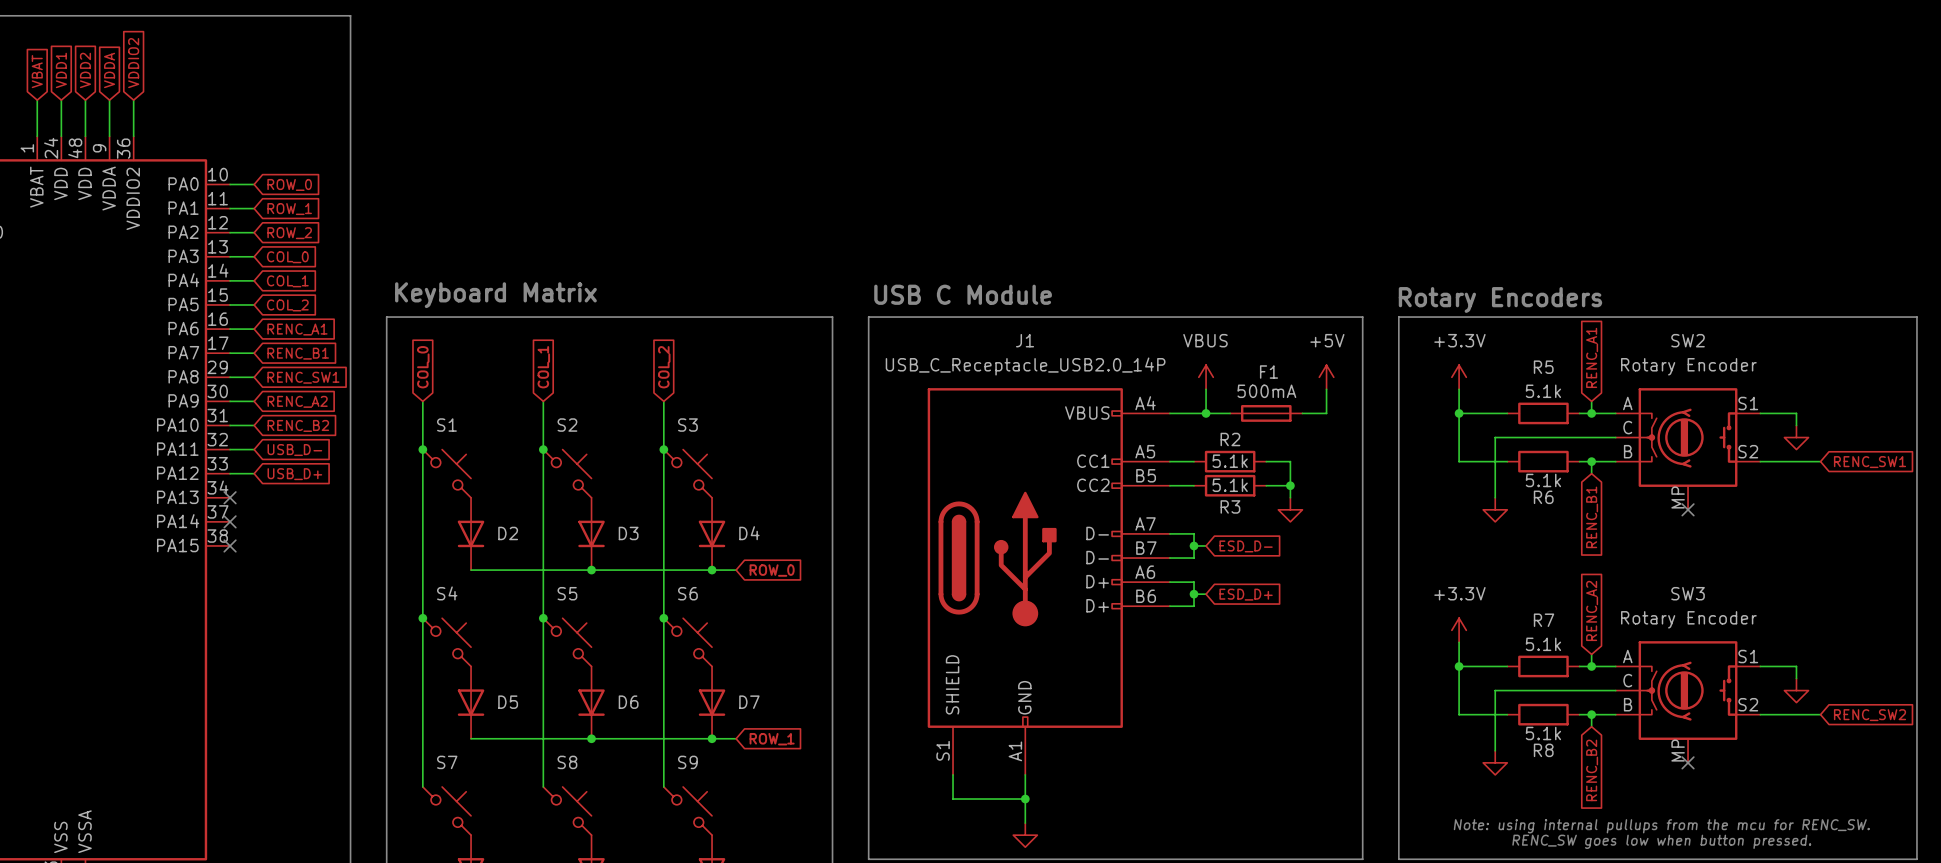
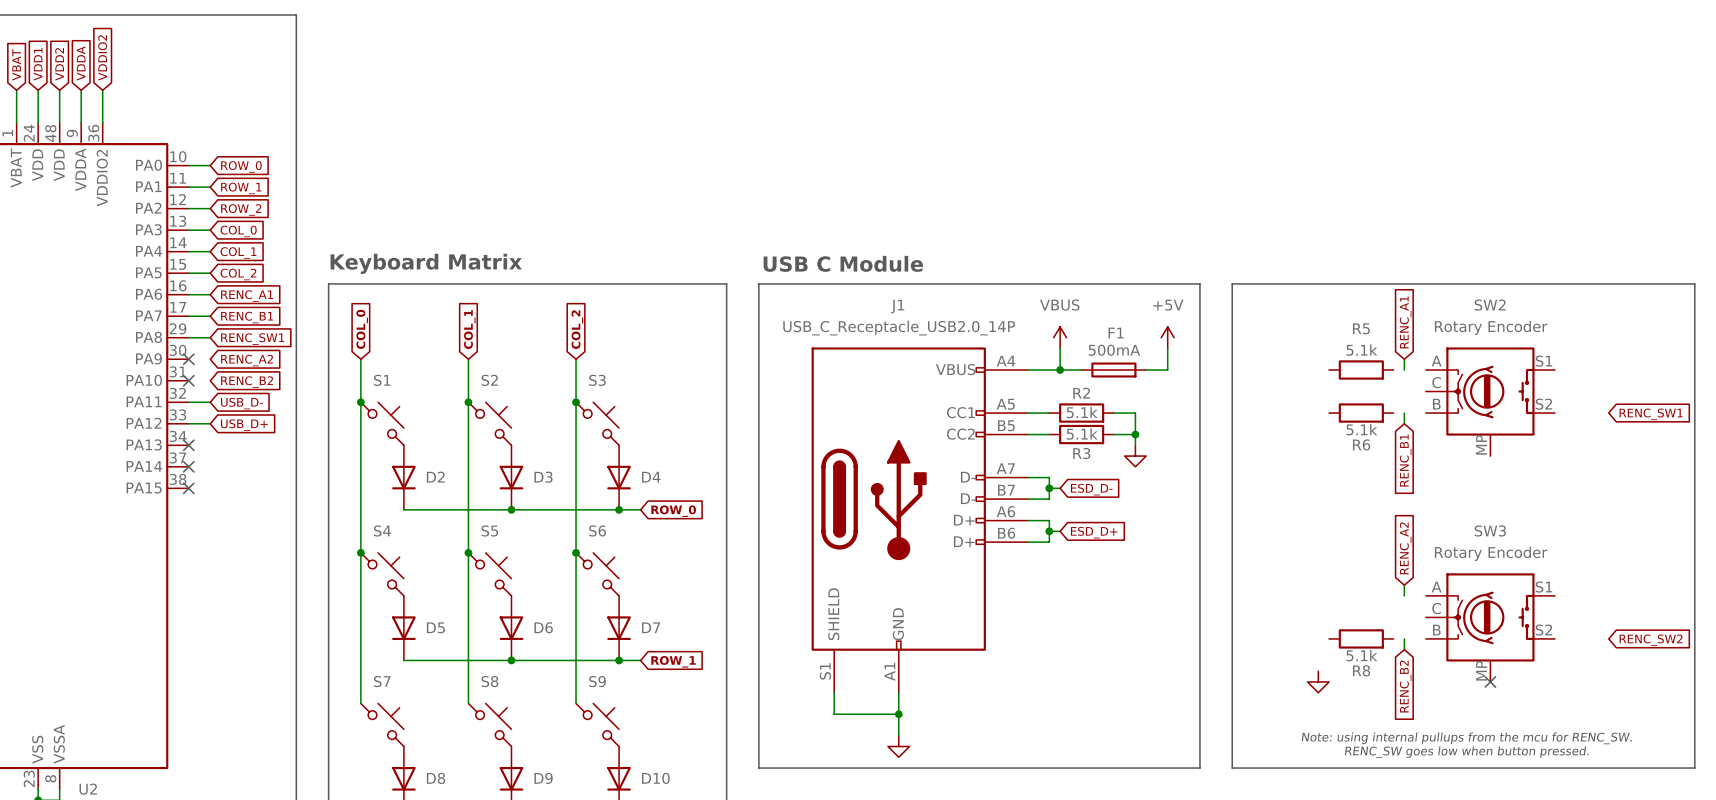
text: Rotary Encoders (1500, 299) -> none
power symbol: +3.3V (1459, 377) -> none
wire: (1459, 389) (1459, 461) (1507, 461) -> none
wire: (230, 401) (254, 401) -> none
no-connect mark: none -> (188, 359)
wire: (1459, 413) (1507, 413) -> none
junction: (1459, 413) -> none
wire: (1579, 413) (1615, 413) -> none
junction: (1591, 413) -> none
wire: (1760, 413) (1796, 413) (1796, 425) -> none
wire: (230, 425) (254, 425) -> none
no-connect mark: none -> (188, 380)
wire: (1615, 437) (1495, 437) (1495, 497) -> none
power symbol: (1796, 437) -> none
wire: (1579, 461) (1615, 461) -> none
junction: (1591, 461) -> none
wire: (1760, 461) (1820, 461) -> none
power symbol: (1495, 509) -> none
no-connect mark: (1688, 509) -> none
power symbol: +3.3V (1459, 630) -> none
wire: (1459, 642) (1459, 714) (1507, 714) -> none
wire: (1459, 666) (1507, 666) -> none
junction: (1459, 666) -> none
R7: 5.1k (1543, 666) -> none
wire: (1579, 666) (1615, 666) -> none
junction: (1591, 666) -> none
wire: (1760, 666) (1796, 666) (1796, 678) -> none
wire: (1615, 690) (1495, 690) (1495, 750) -> none
power symbol: (1796, 690) -> none
wire: (1579, 714) (1615, 714) -> none
junction: (1591, 714) -> none
wire: (1760, 714) (1820, 714) -> none

